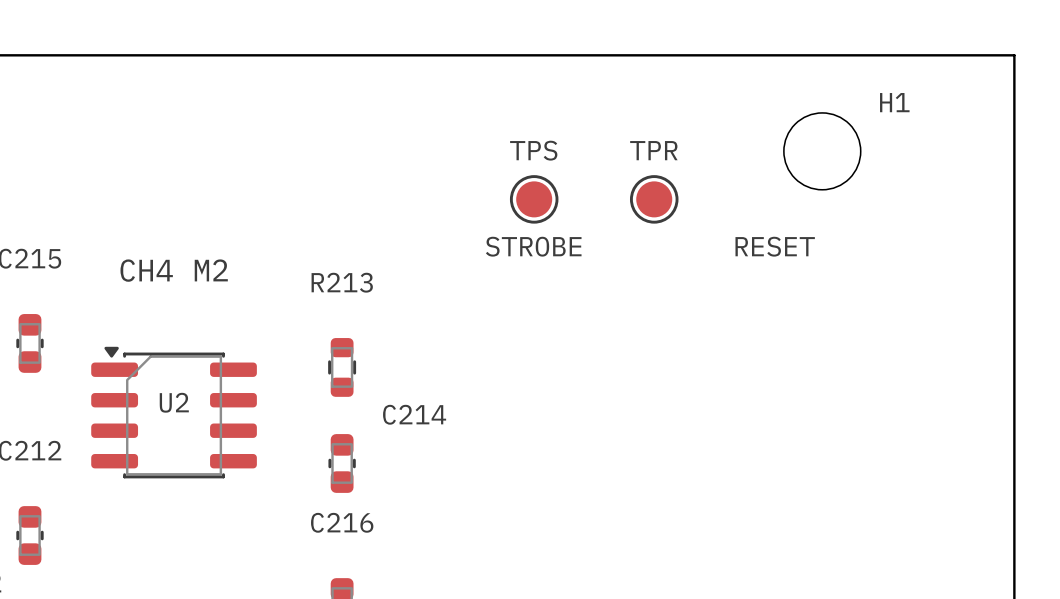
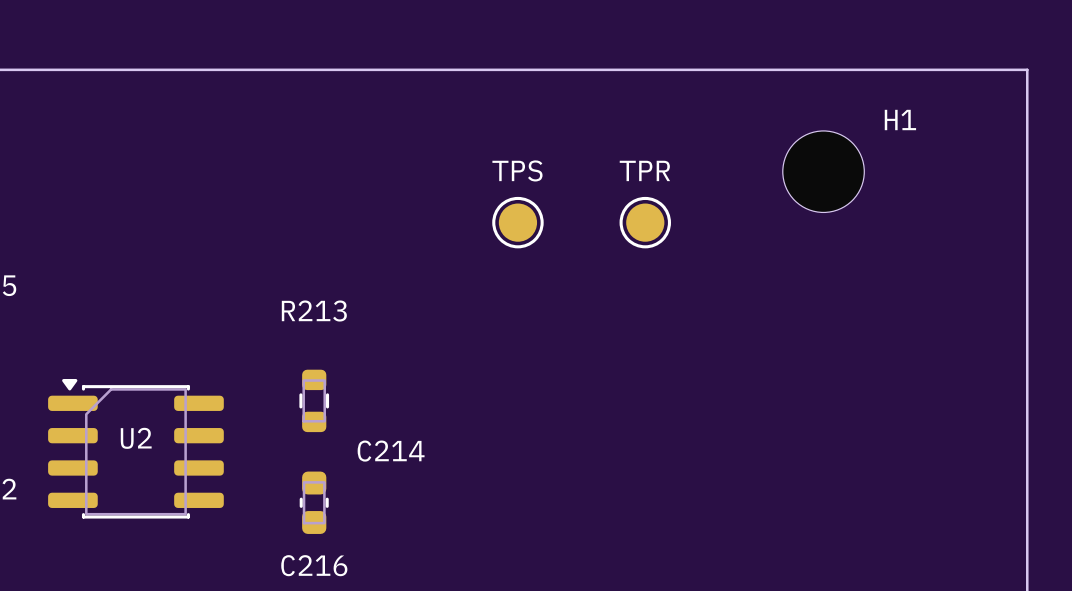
text: STROBE (533, 246) -> none
text: RESET (775, 246) -> none
text: CH4 M2 (174, 270) -> none

